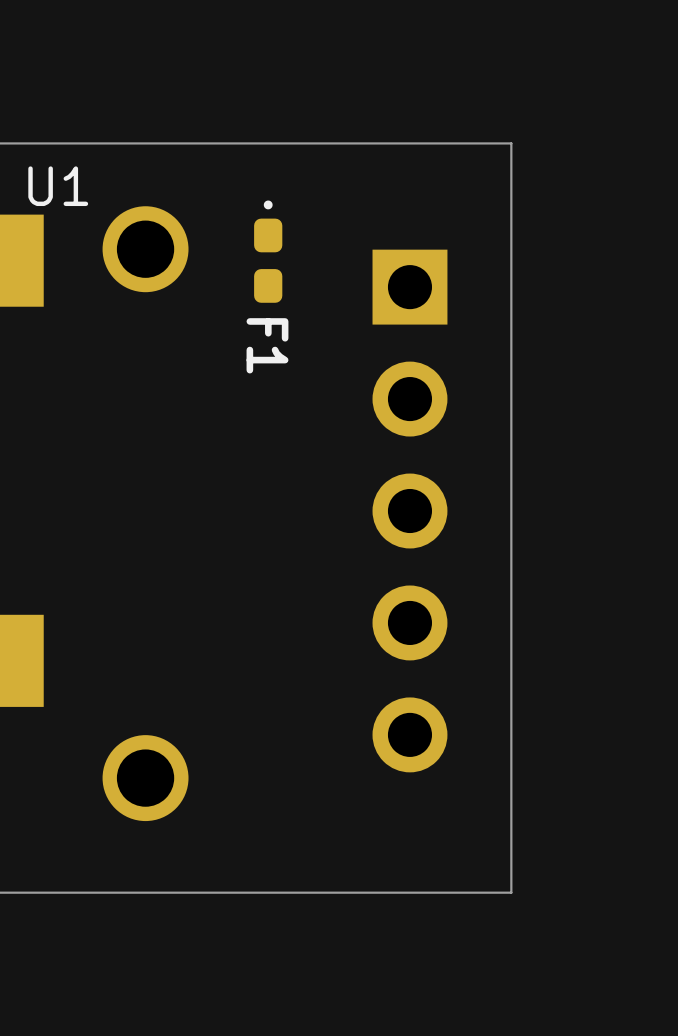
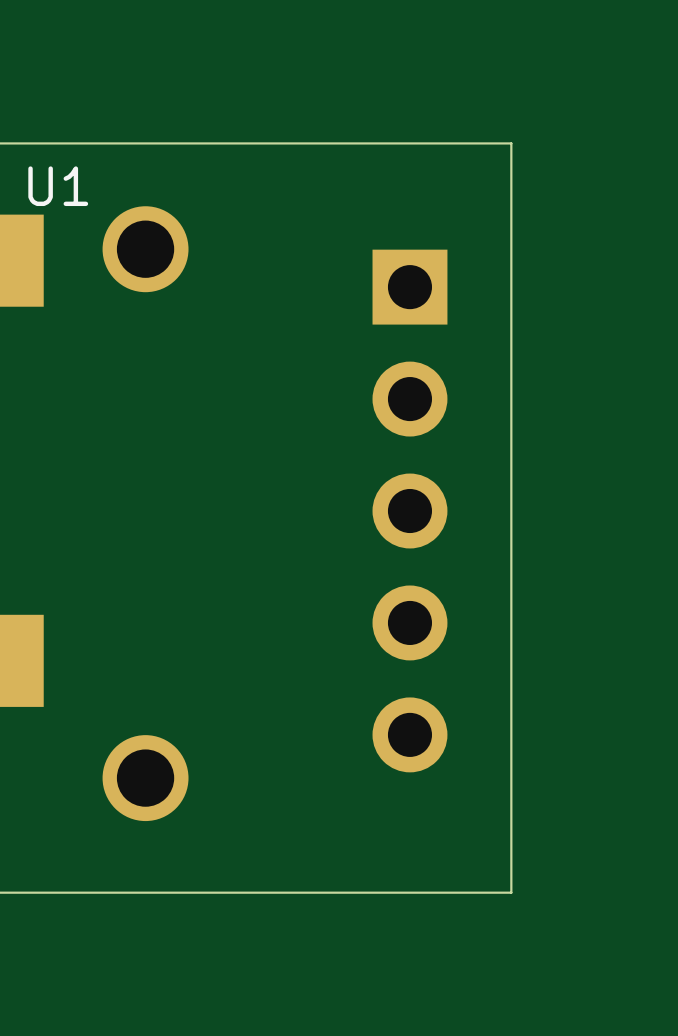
F1: (268, 251) -> none

